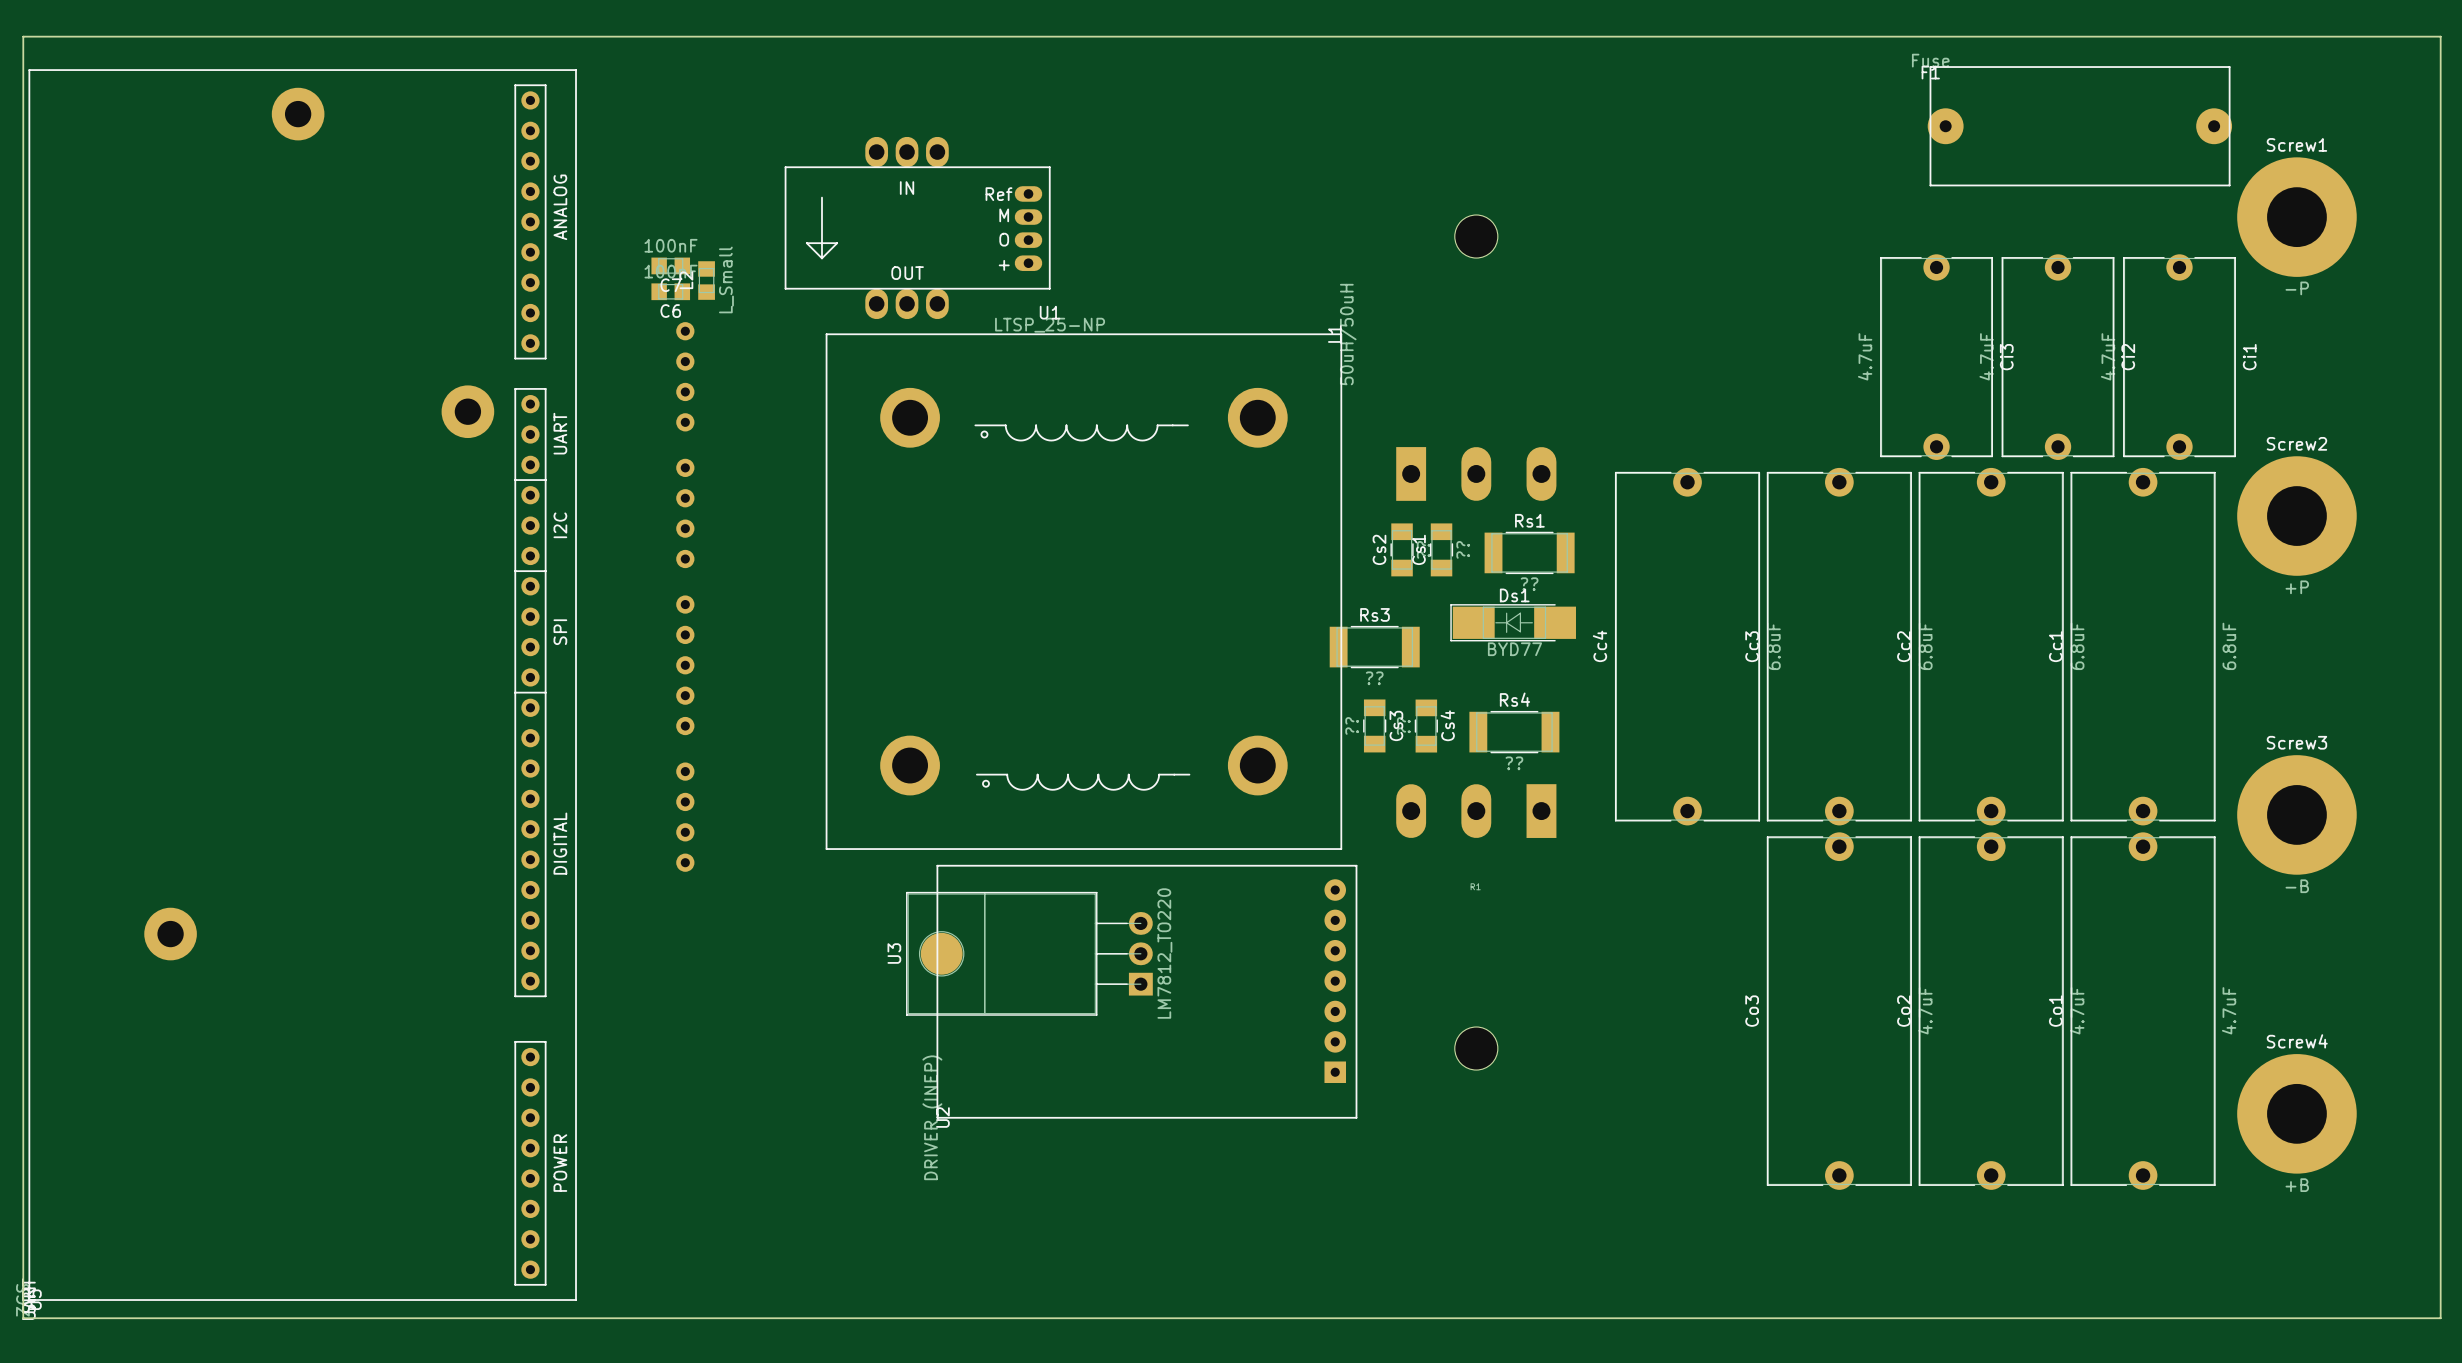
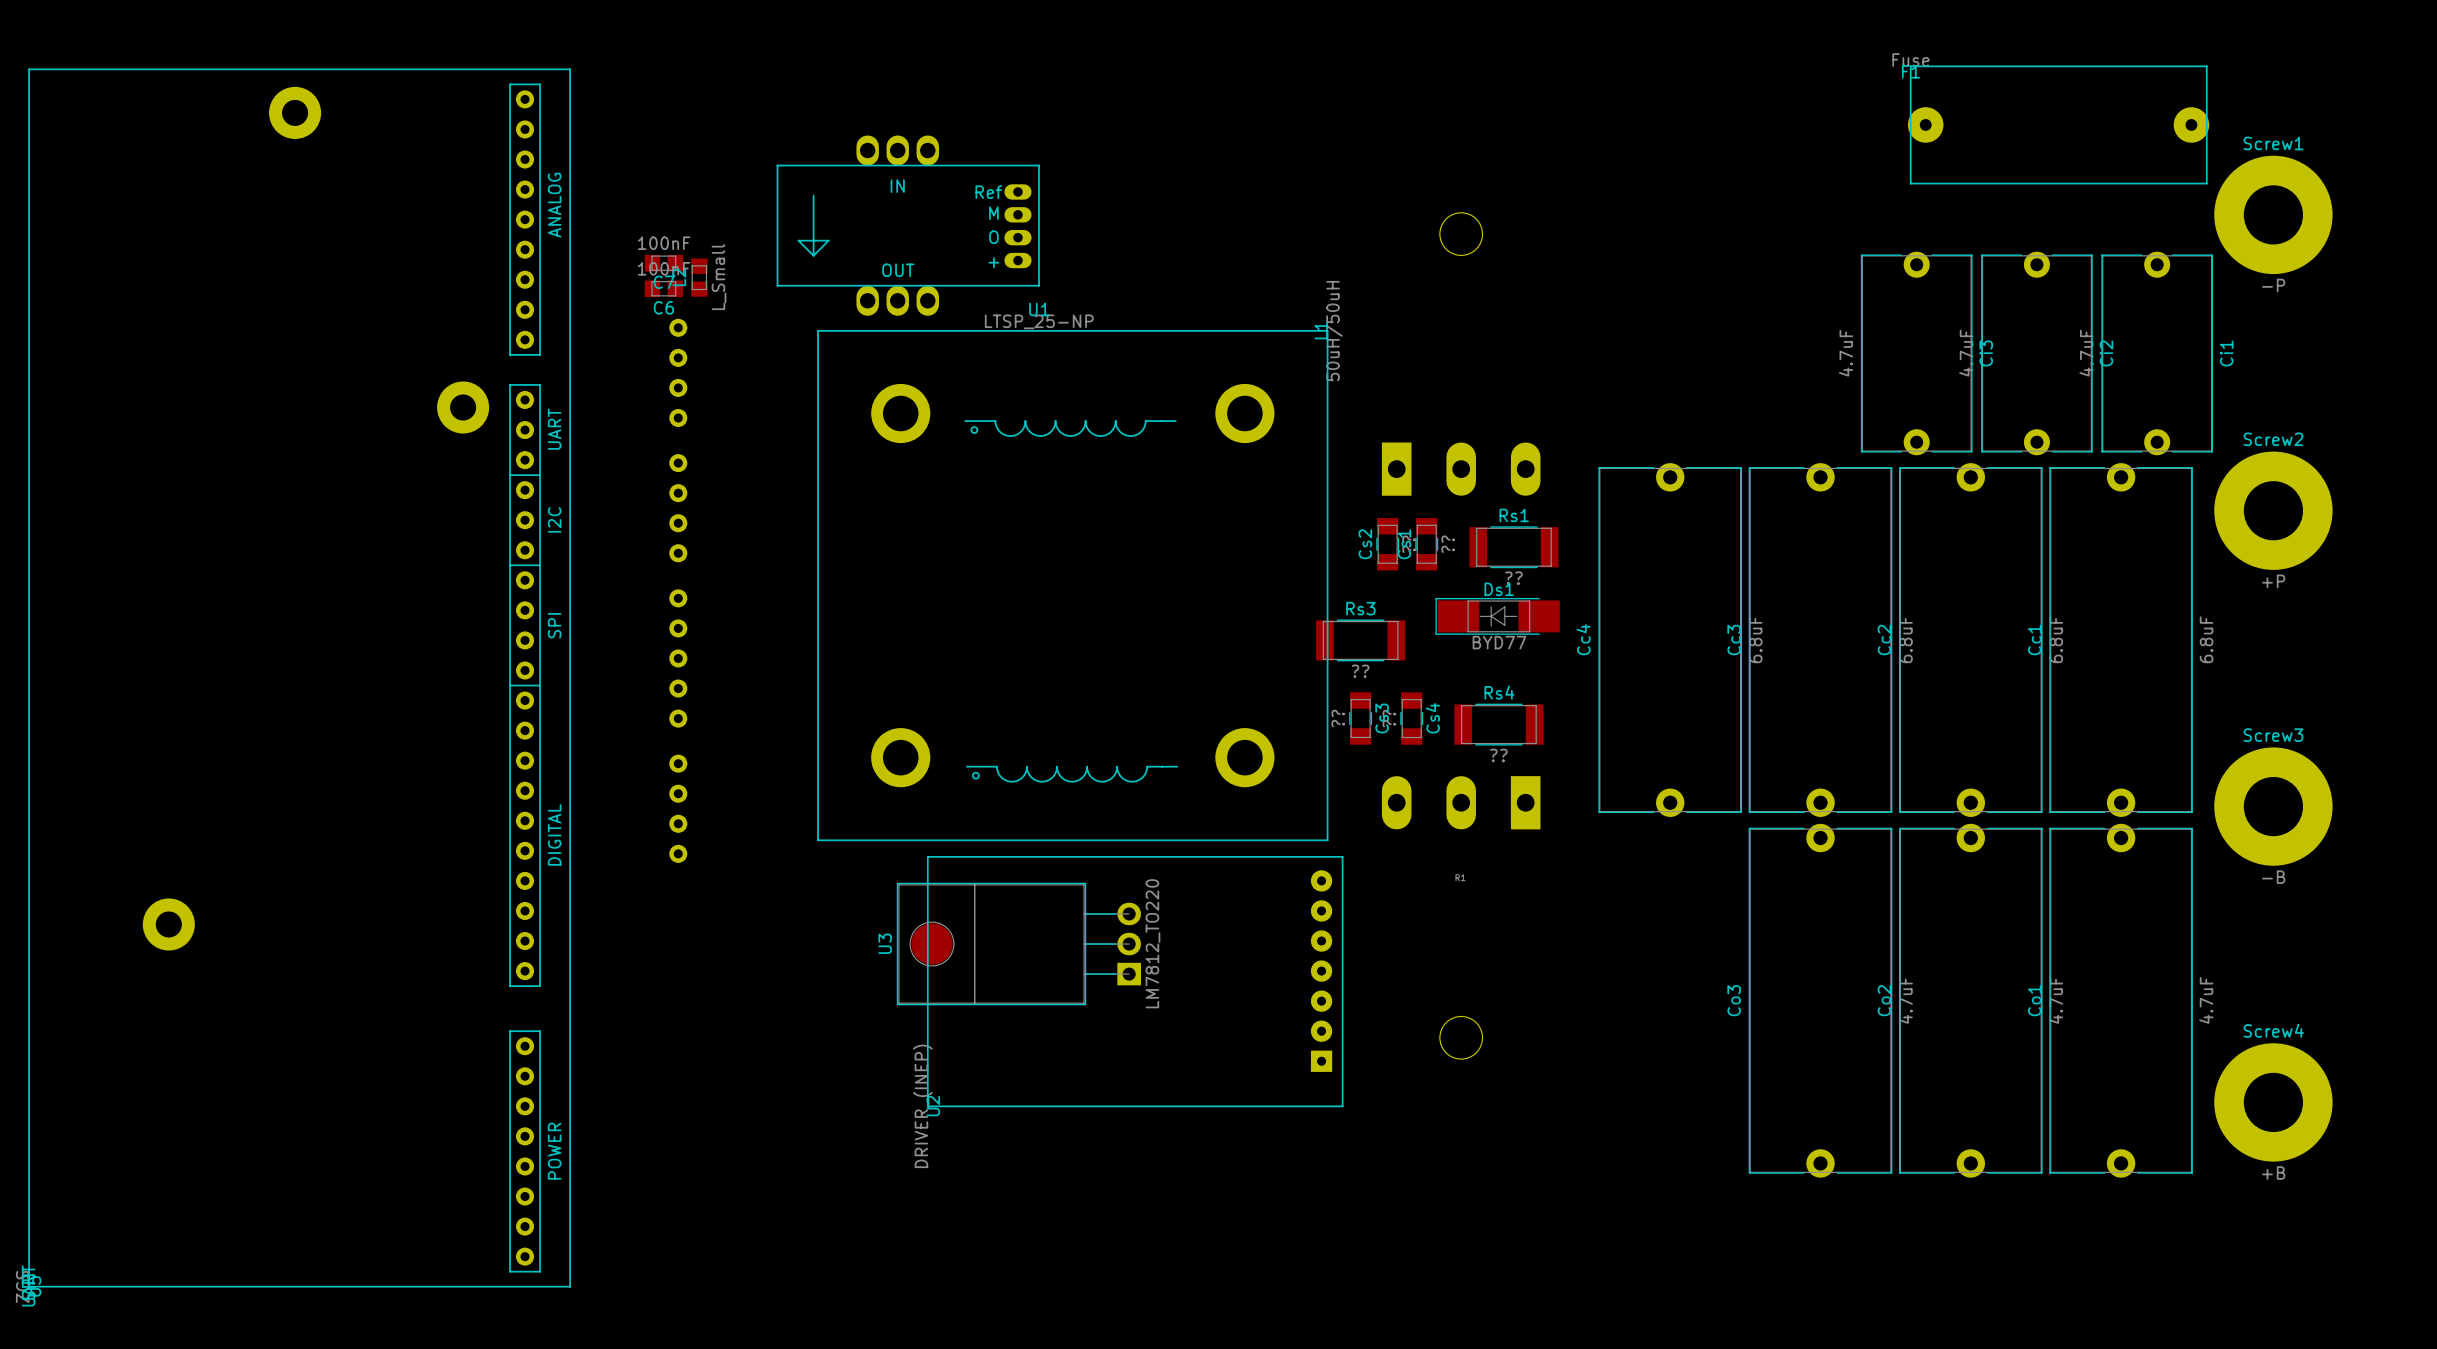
board edge: (23, 36) (23, 1318) (2440, 1318) (2440, 36) (23, 36) -> none

